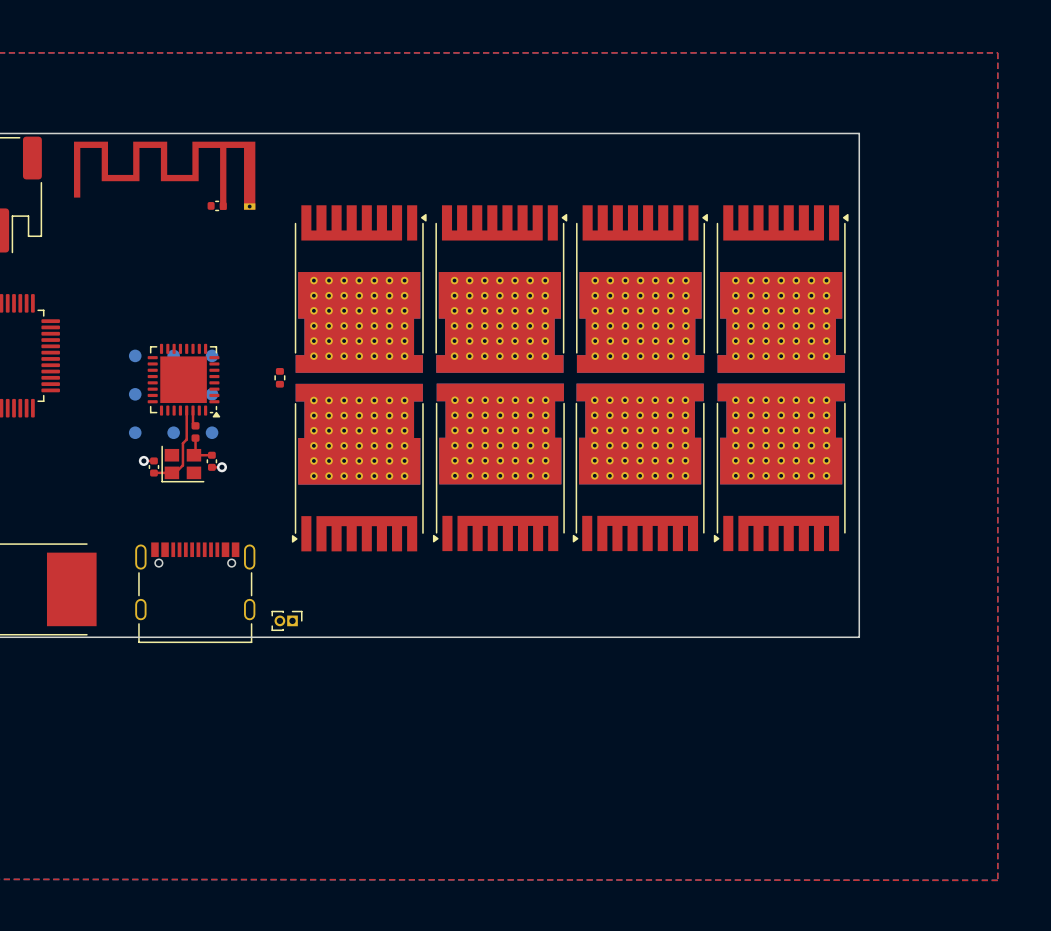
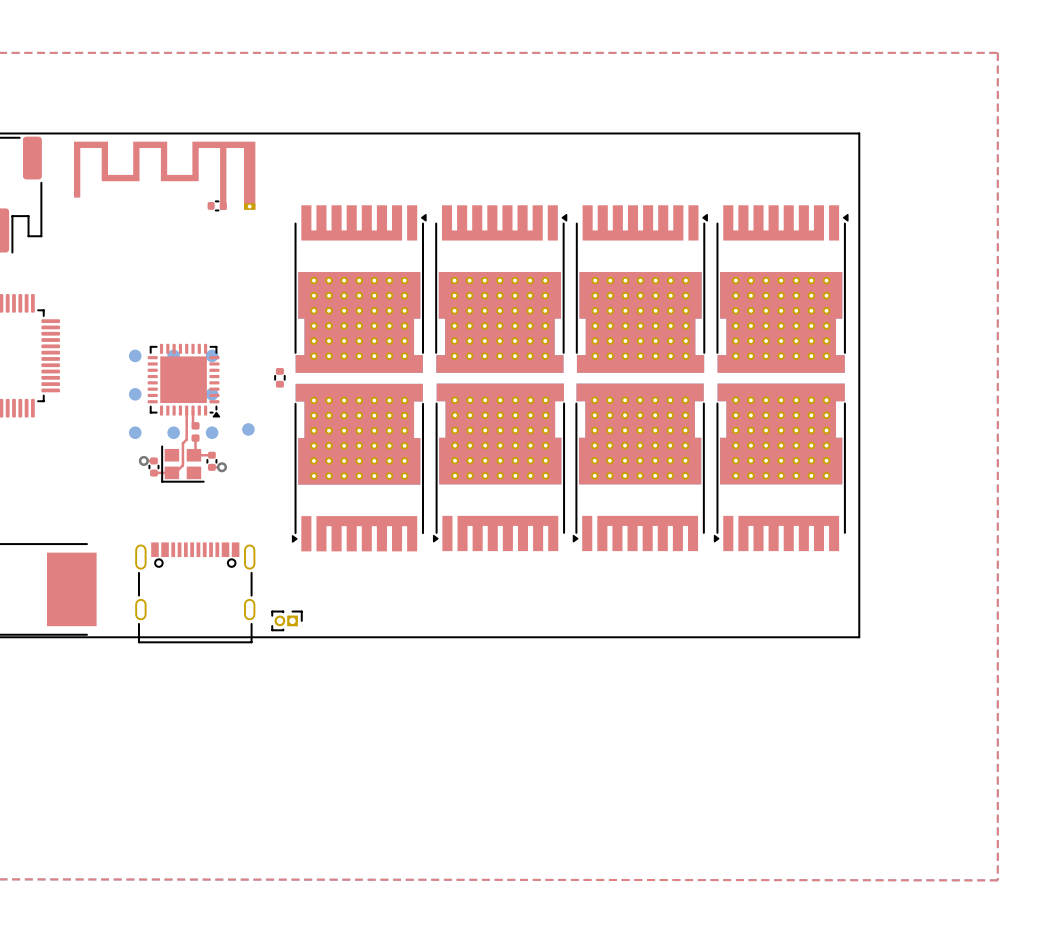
part: none -> (248, 429)

